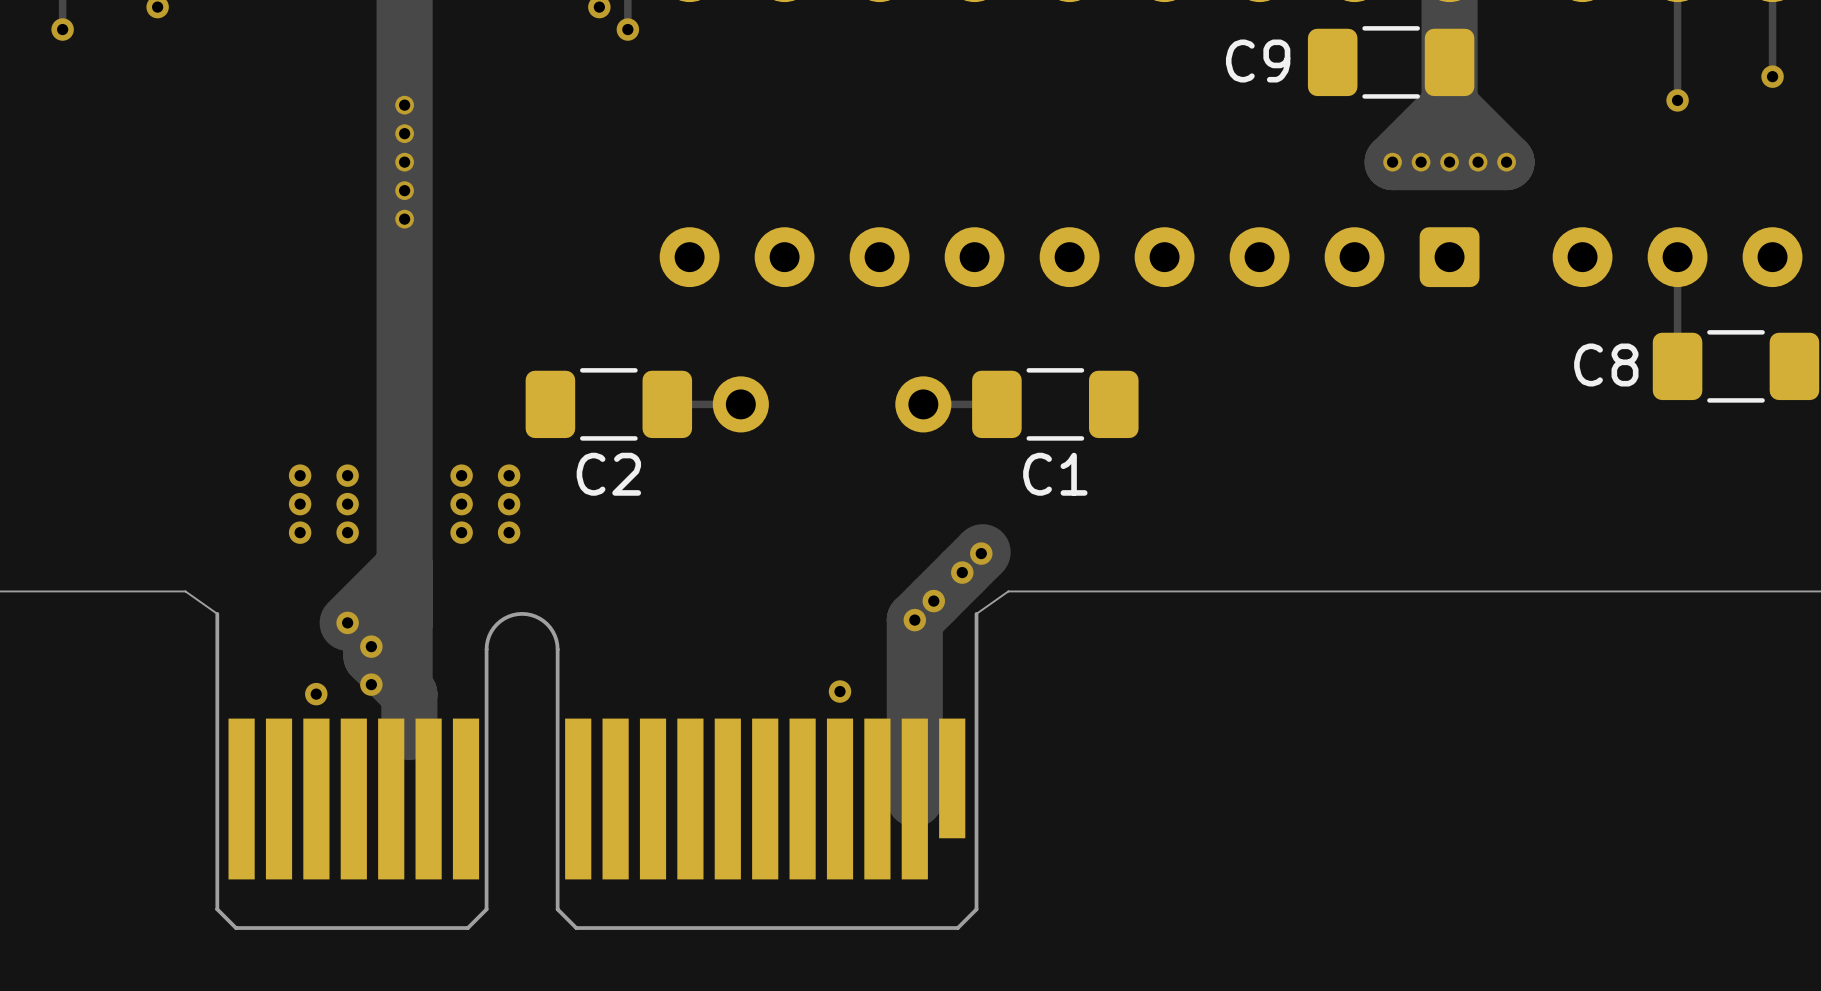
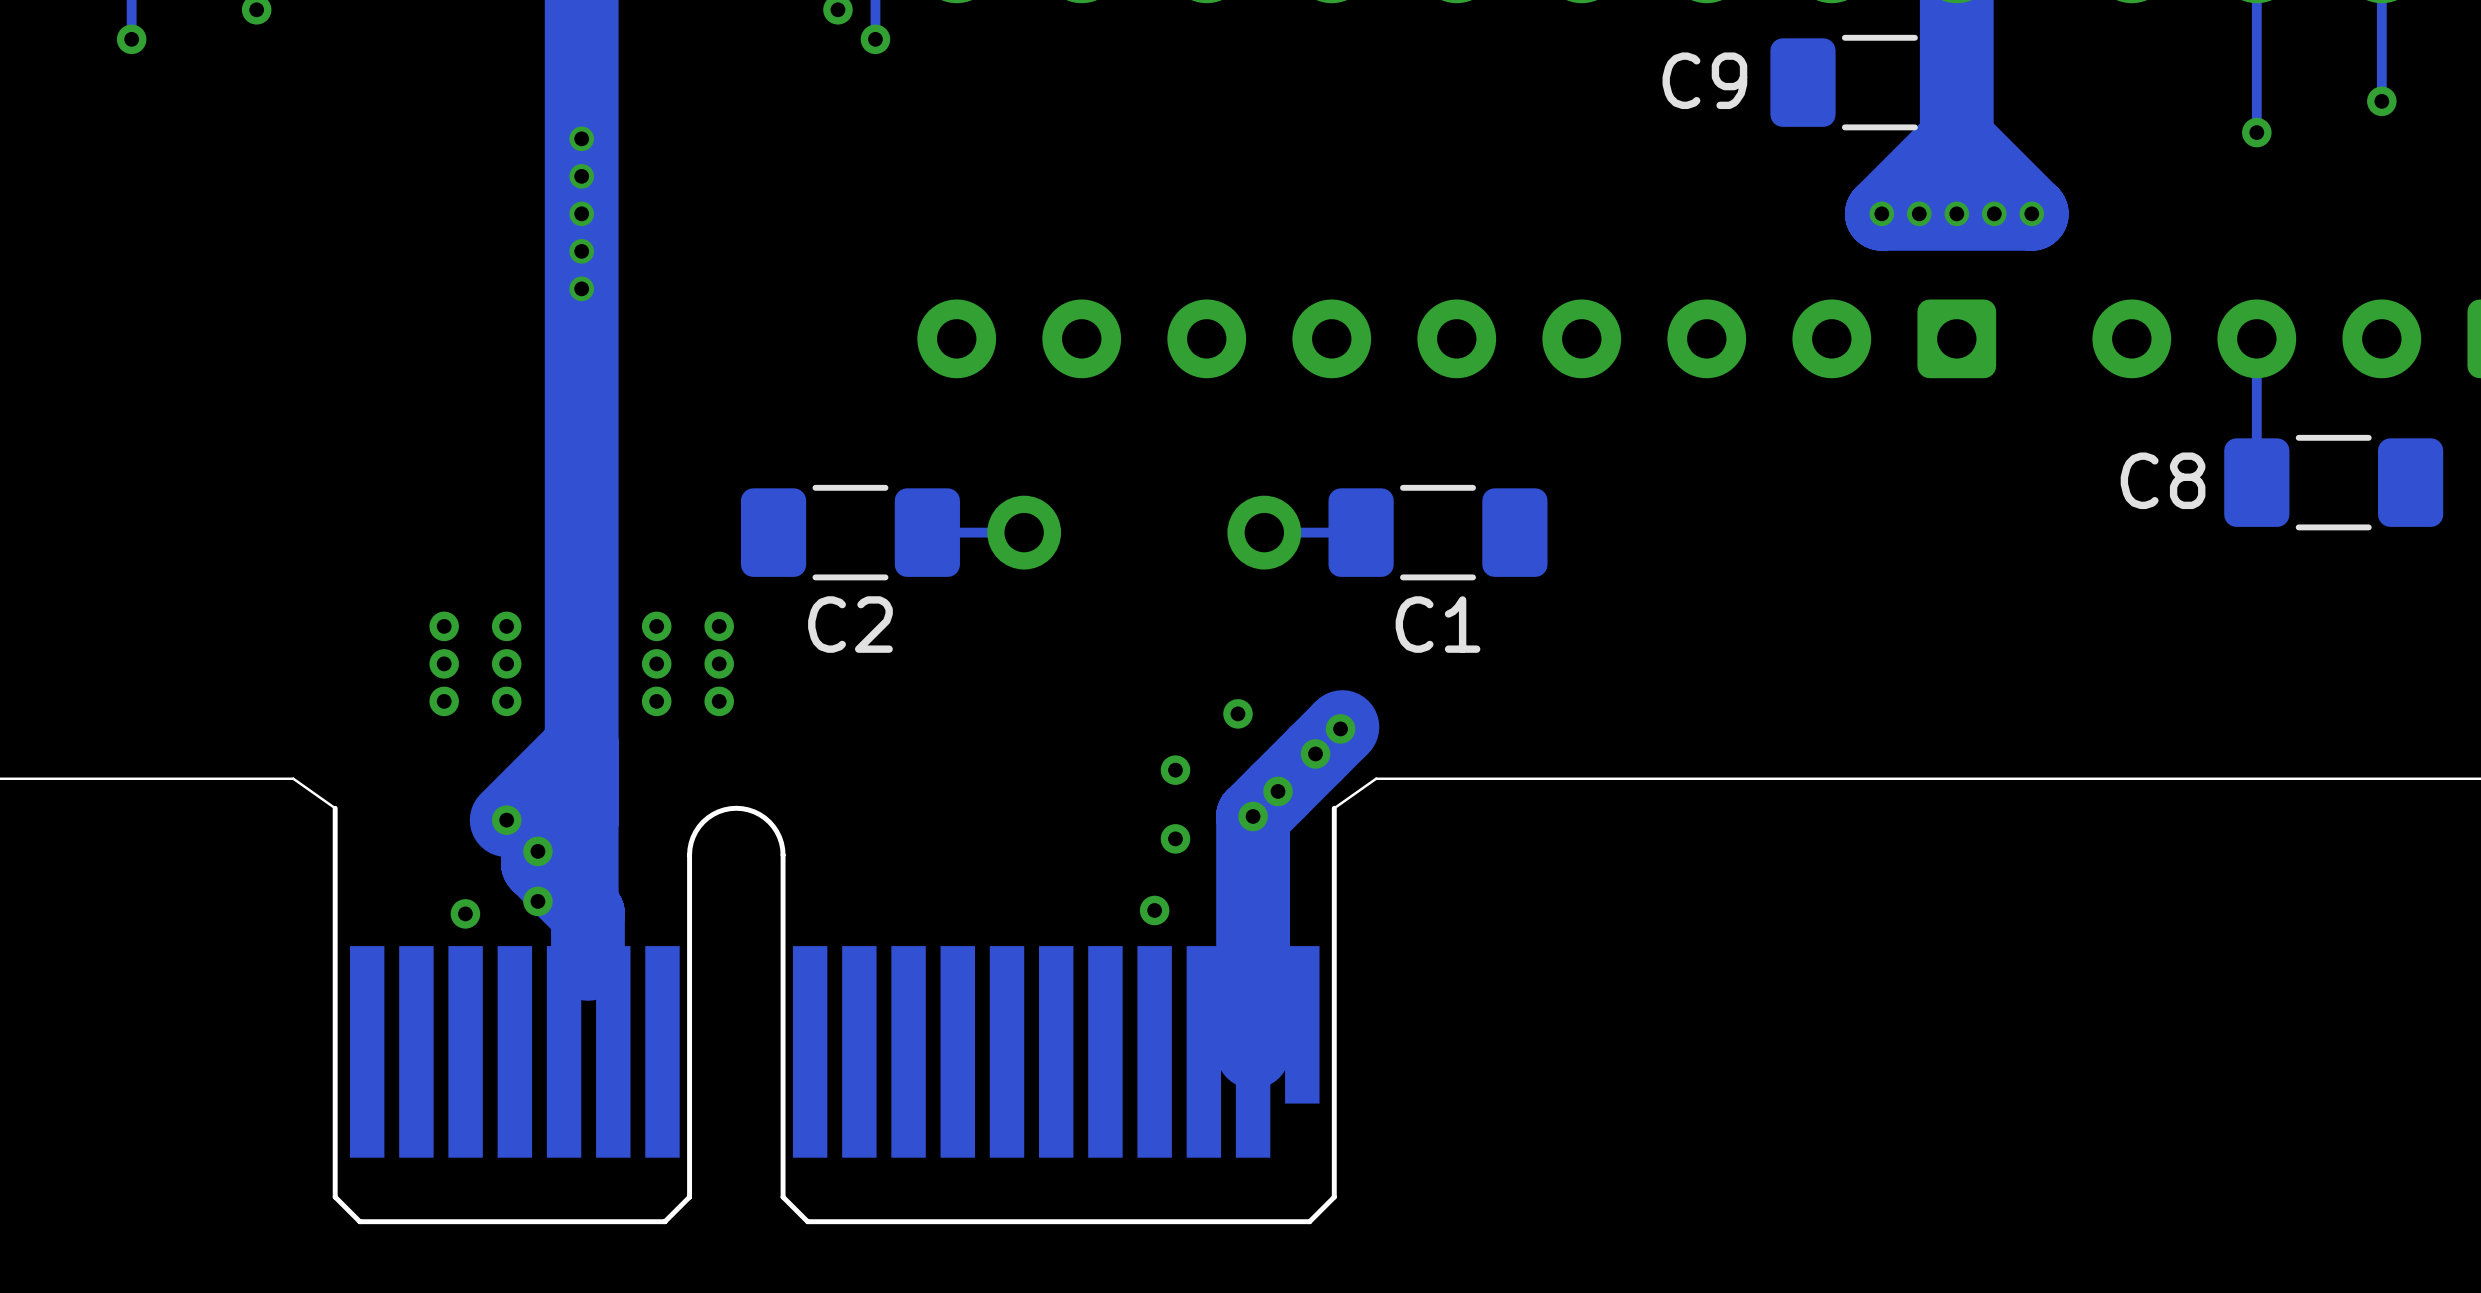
via: none -> (1237, 713)
via: none -> (1175, 770)
via: none -> (1175, 838)

